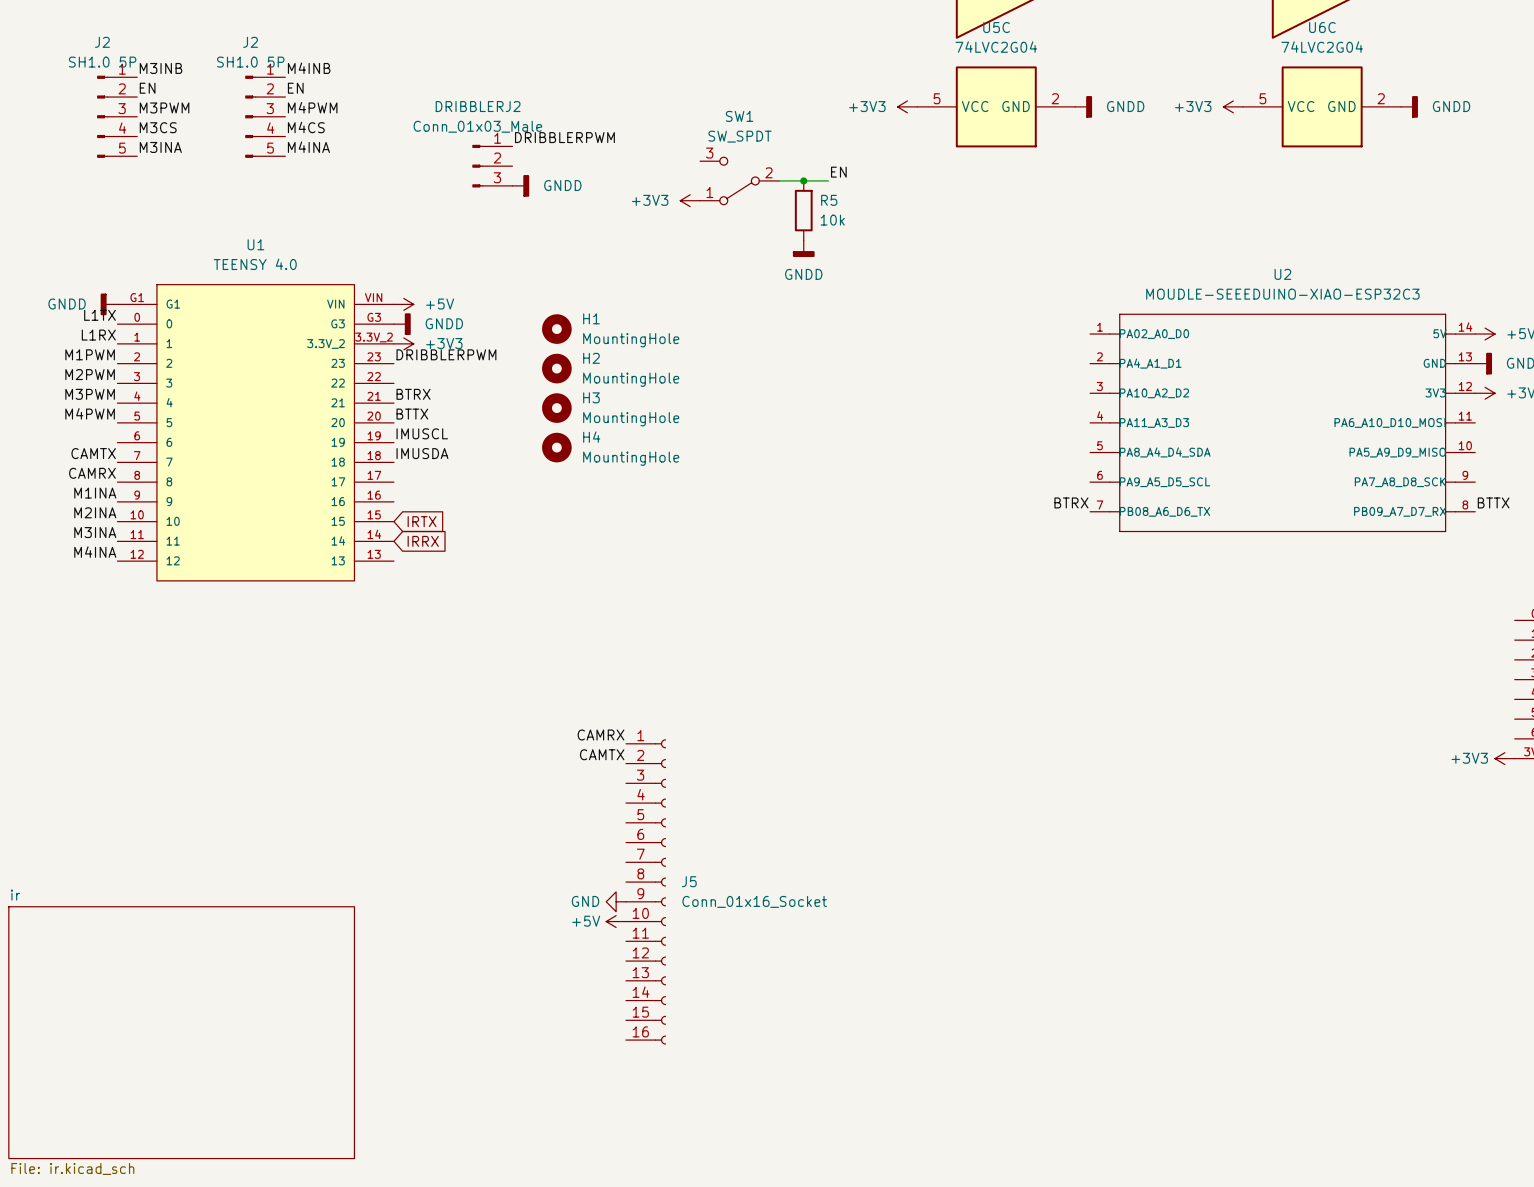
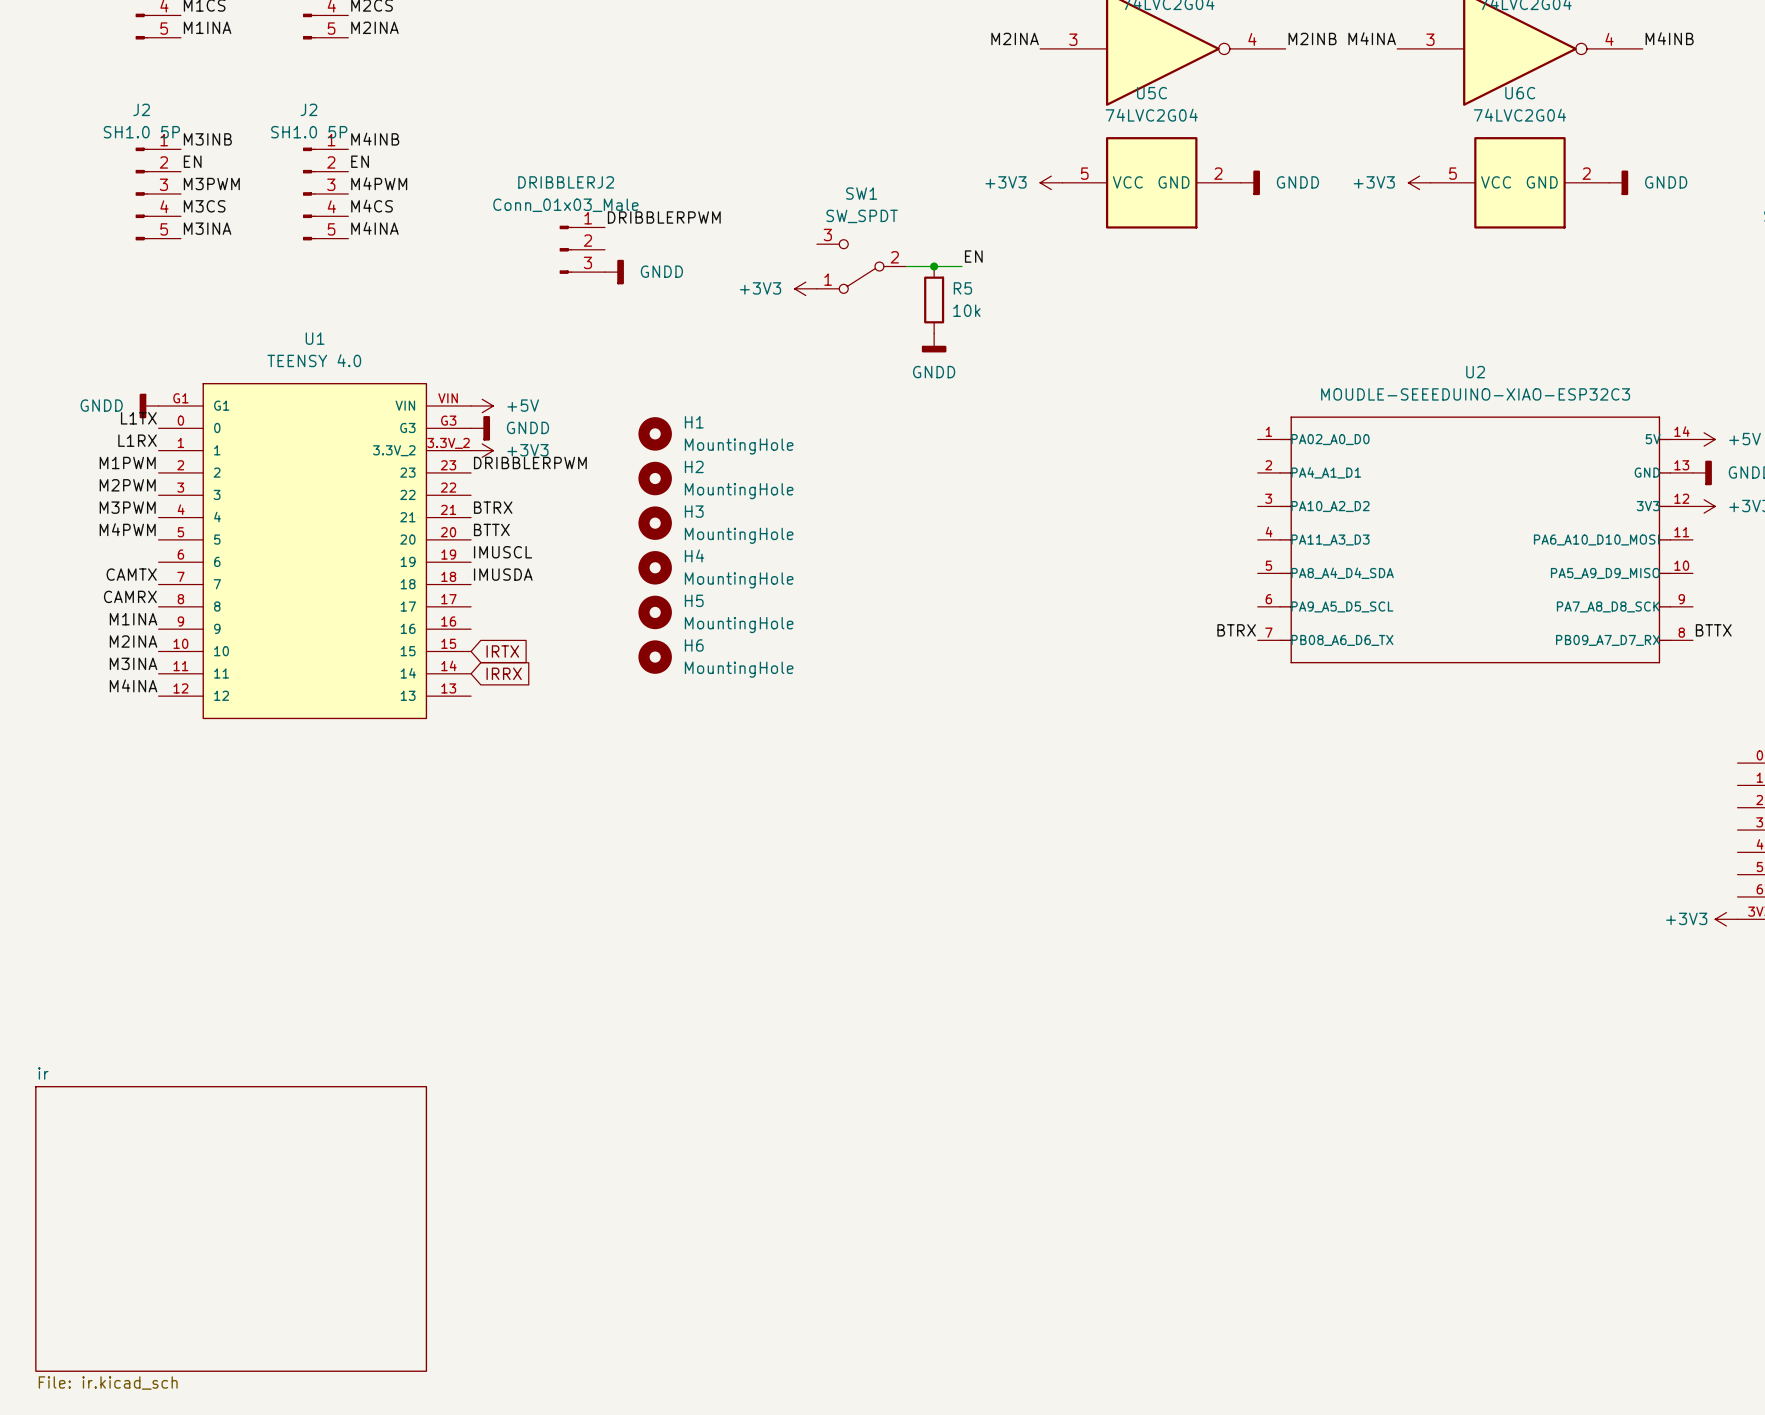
H5: none -> MountingHole (655, 612)
H6: none -> MountingHole (655, 657)
label: CAMRX (601, 735) -> none
label: CAMTX (602, 754) -> none
J5: Conn_01x16_Socket (646, 891) -> none
power symbol: GND (616, 901) -> none
power symbol: +5V (616, 921) -> none

